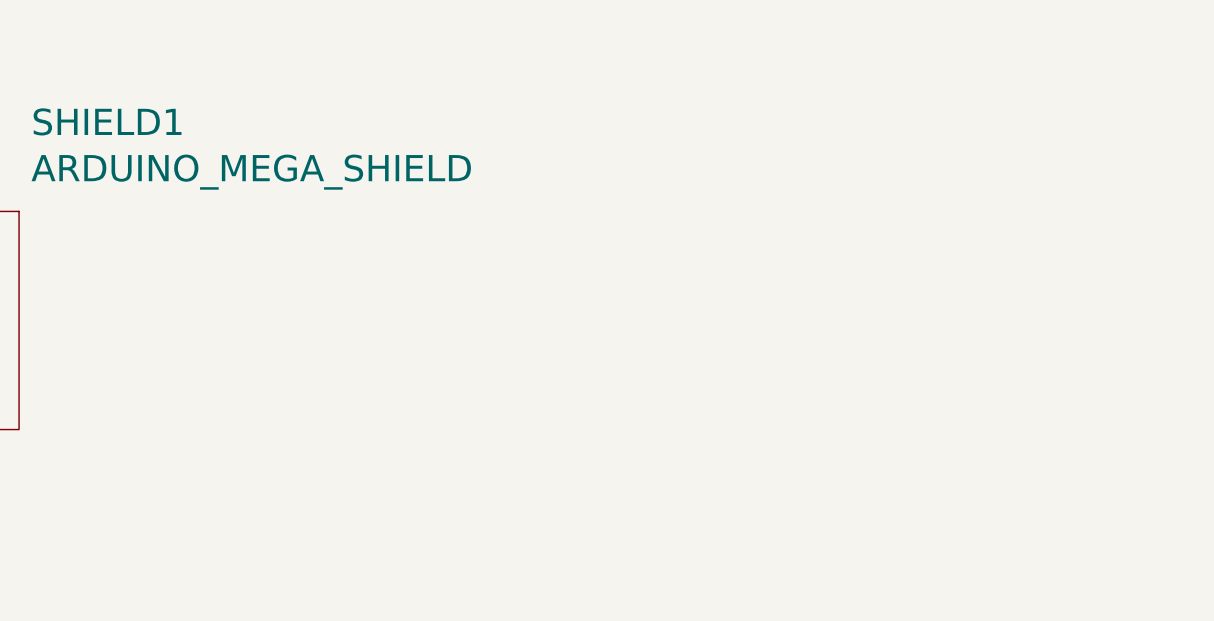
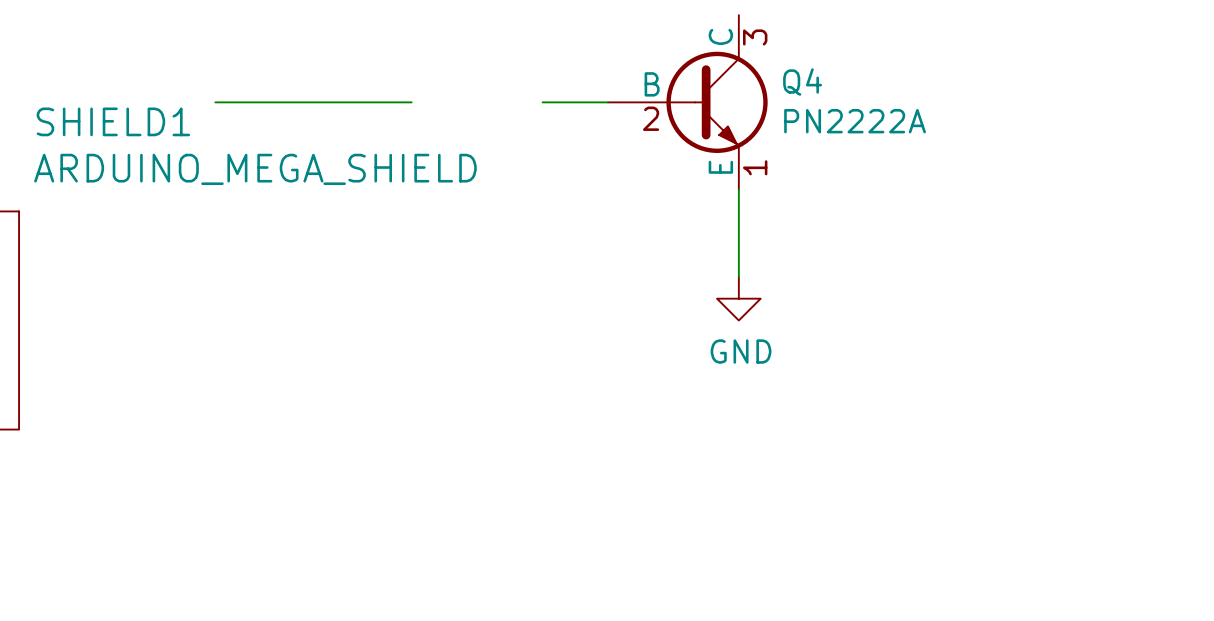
wire: none -> (215, 102) (411, 102)
wire: none -> (542, 102) (607, 102)
Q4: none -> PN2222A (687, 102)
wire: none -> (738, 189) (738, 276)
power symbol: none -> GND (738, 298)

